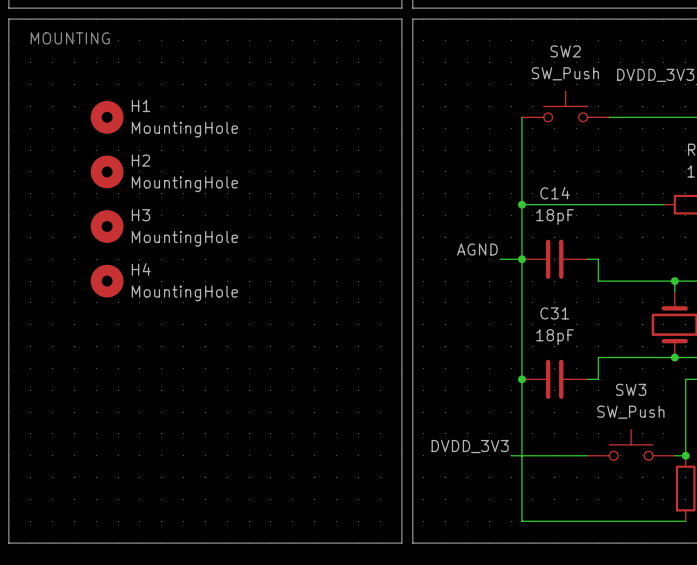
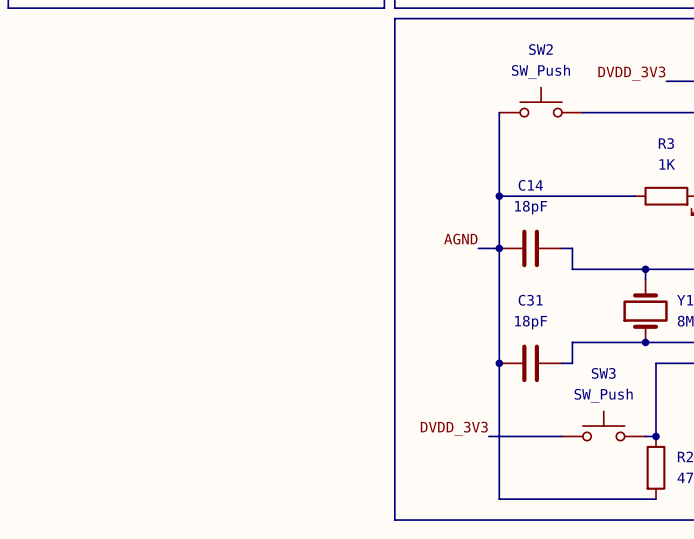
line: (8, 19) (401, 19) (401, 543) (8, 543) (8, 19) -> none
text: MOUNTING (70, 38) -> none
H1: MountingHole (107, 117) -> none
H2: MountingHole (107, 171) -> none
H3: MountingHole (107, 226) -> none
H4: MountingHole (107, 281) -> none

